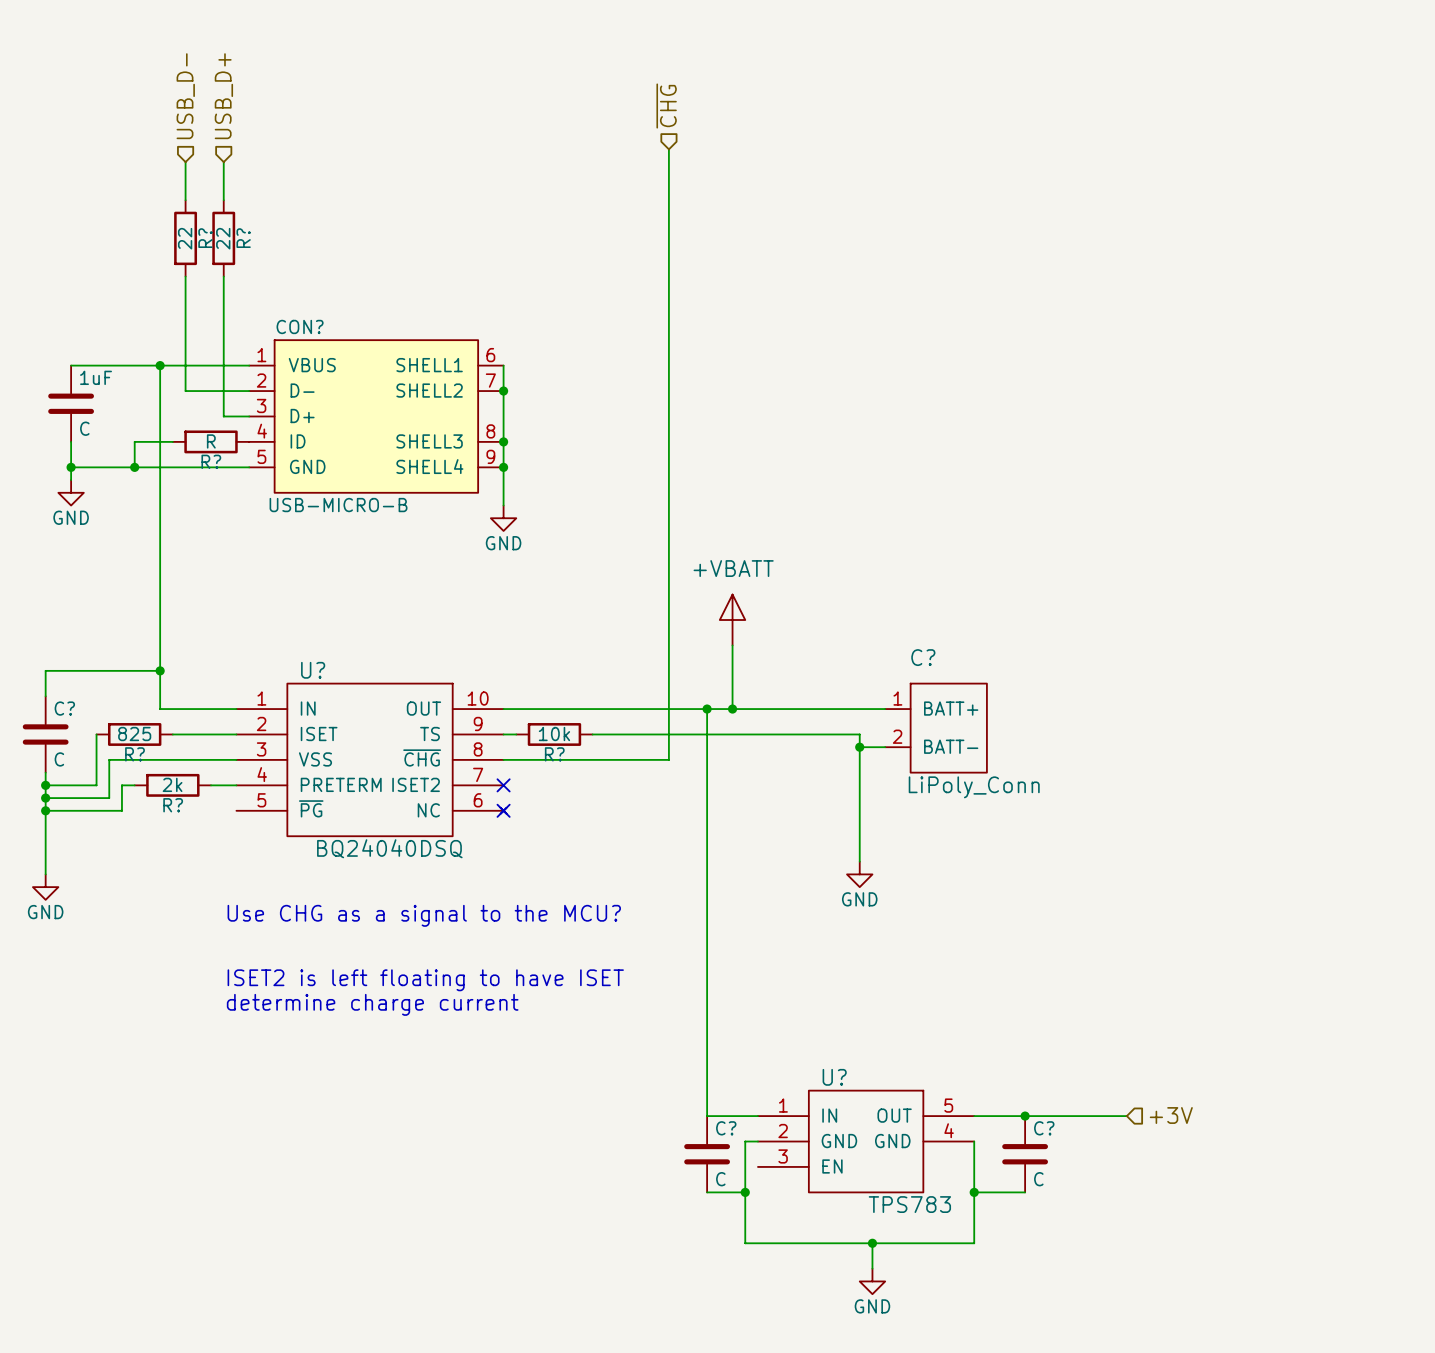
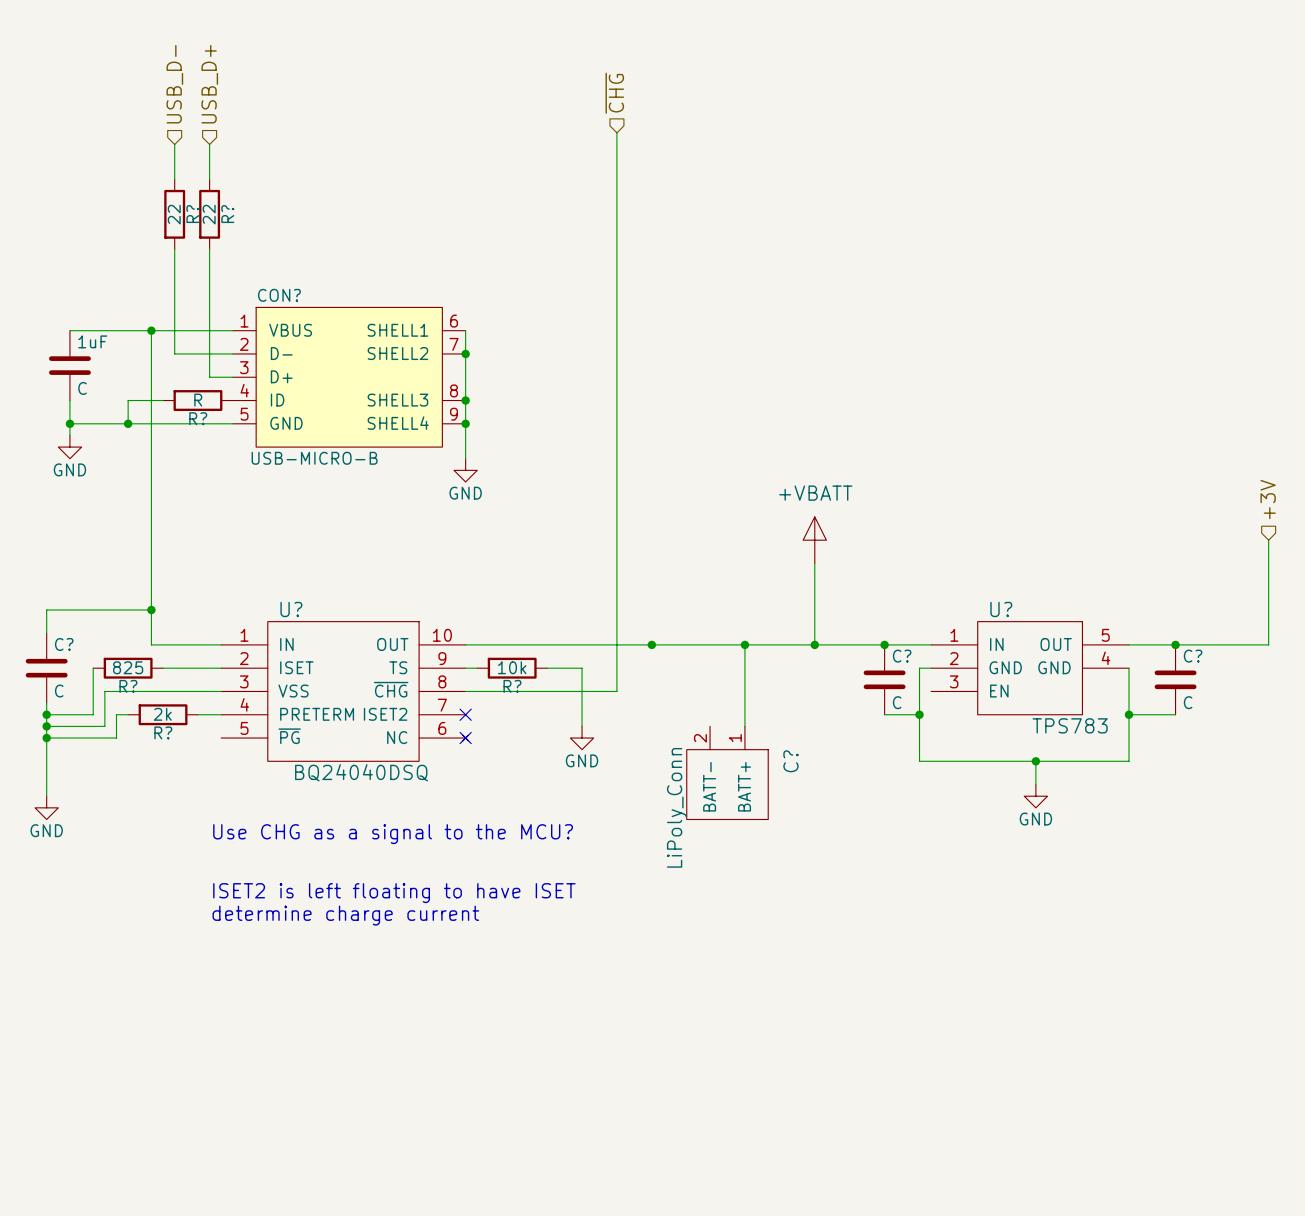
hierarchical label: none -> +3V (1268, 499)
wire: none -> (1268, 540) (1268, 644) (1129, 644)
power symbol position: +VBATT (732, 620) -> +VBATT (814, 540)
wire: none -> (814, 563) (814, 644) (931, 644)
wire: (732, 645) (732, 709) -> none
wire: (707, 709) (707, 1116) (757, 1116) -> none
junction: (732, 709) -> none
wire: none -> (744, 644) (744, 726)
junction: none -> (744, 644)
junction: none -> (814, 644)
junction: none -> (884, 644)
junction: none -> (1175, 644)
C? position: (936, 728) -> (727, 772)
C? rotation: 0° (948, 728) -> 90° clockwise (727, 784)
wire: (630, 734) (859, 734) (859, 861) -> (582, 668) (582, 726)
wire: none -> (931, 668) (919, 668) (919, 761) (1129, 761) (1129, 668)
U?: none -> TPS783 (1030, 668)
wire: (859, 747) (885, 747) -> none
junction: (859, 747) -> none
C?: none -> C (884, 679)
C?: none -> C (1175, 679)
wire: none -> (884, 714) (919, 714)
junction: none -> (919, 714)
wire: none -> (1129, 714) (1175, 714)
junction: none -> (1129, 714)
power symbol: none -> GND (582, 738)
wire: none -> (1035, 761) (1035, 784)
junction: none -> (1035, 761)
power symbol: GND (859, 874) -> none
power symbol: none -> GND (1035, 796)
hierarchical label: +3V (1171, 1115) -> none
wire: (974, 1116) (1126, 1116) -> none
junction: (1025, 1116) -> none
wire: (757, 1141) (745, 1141) (745, 1243) (974, 1243) (974, 1141) -> none
U?: TPS783 (866, 1141) -> none
C?: C (707, 1154) -> none
C?: C (1025, 1154) -> none
wire: (707, 1192) (745, 1192) -> none
junction: (745, 1192) -> none
wire: (974, 1192) (1025, 1192) -> none
junction: (974, 1192) -> none
wire: (872, 1243) (872, 1268) -> none
junction: (872, 1243) -> none
power symbol: GND (872, 1281) -> none

